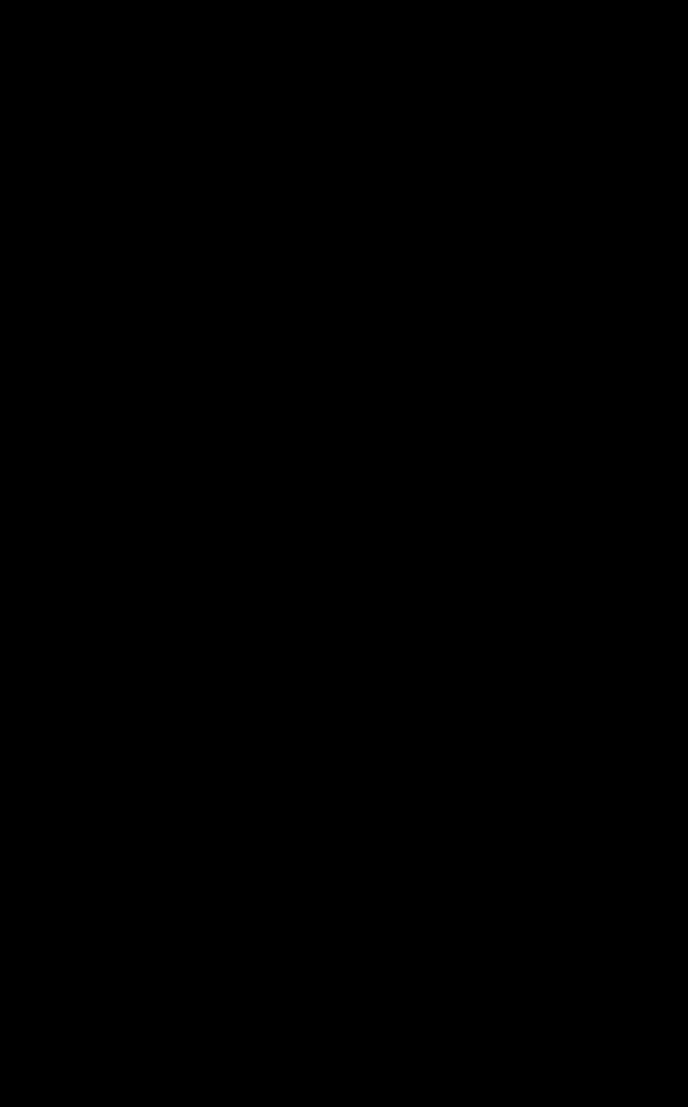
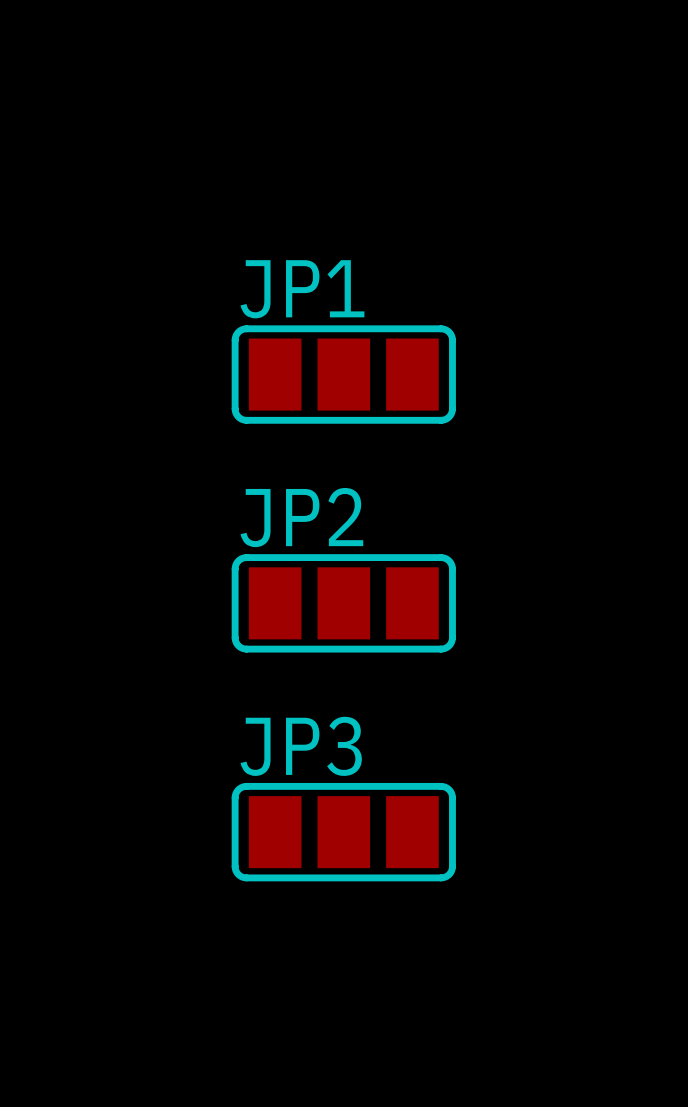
JP1: none -> (343, 374)
JP2: none -> (343, 603)
JP3: none -> (343, 832)

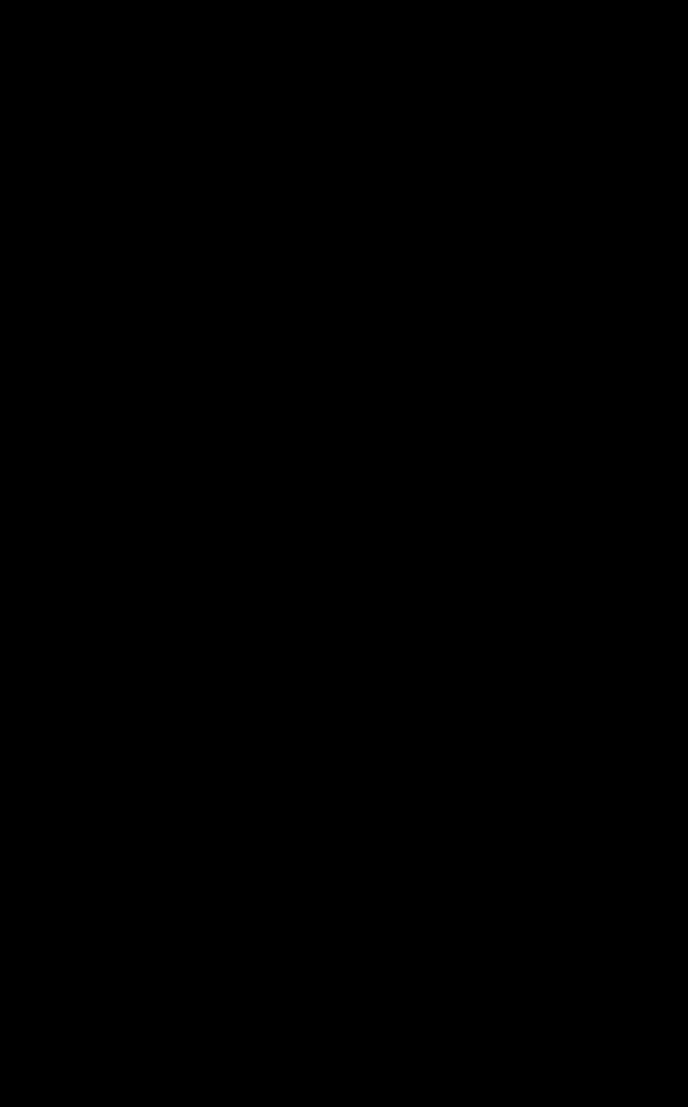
JP1: (343, 374) -> none
JP2: (343, 603) -> none
JP3: (343, 832) -> none

